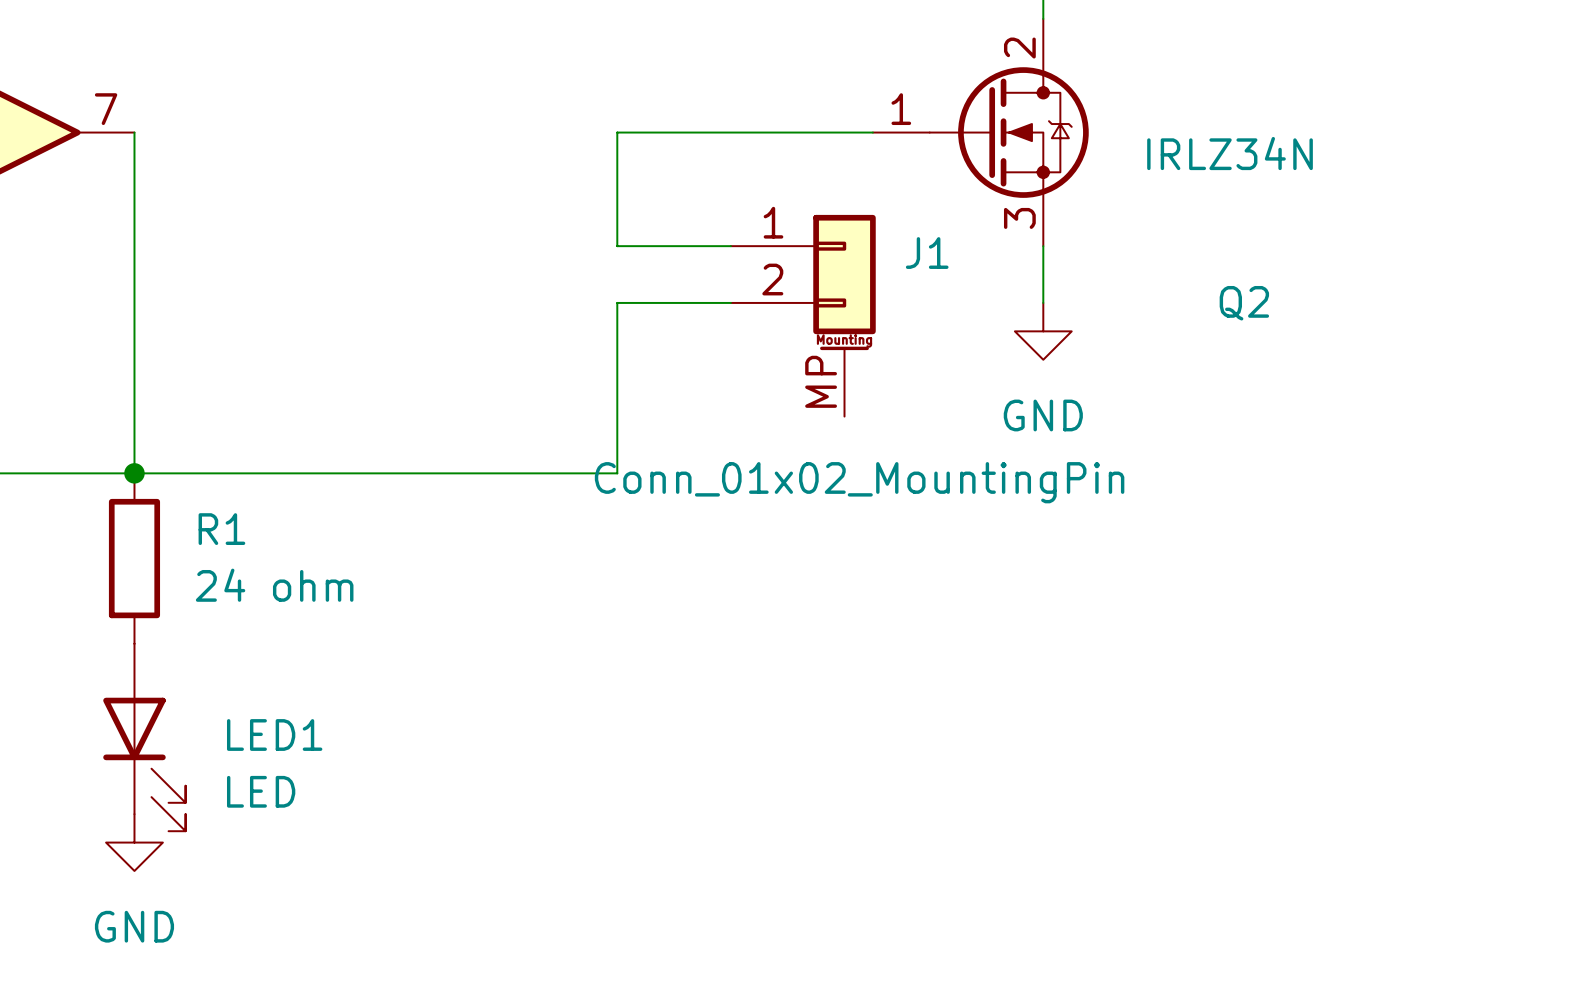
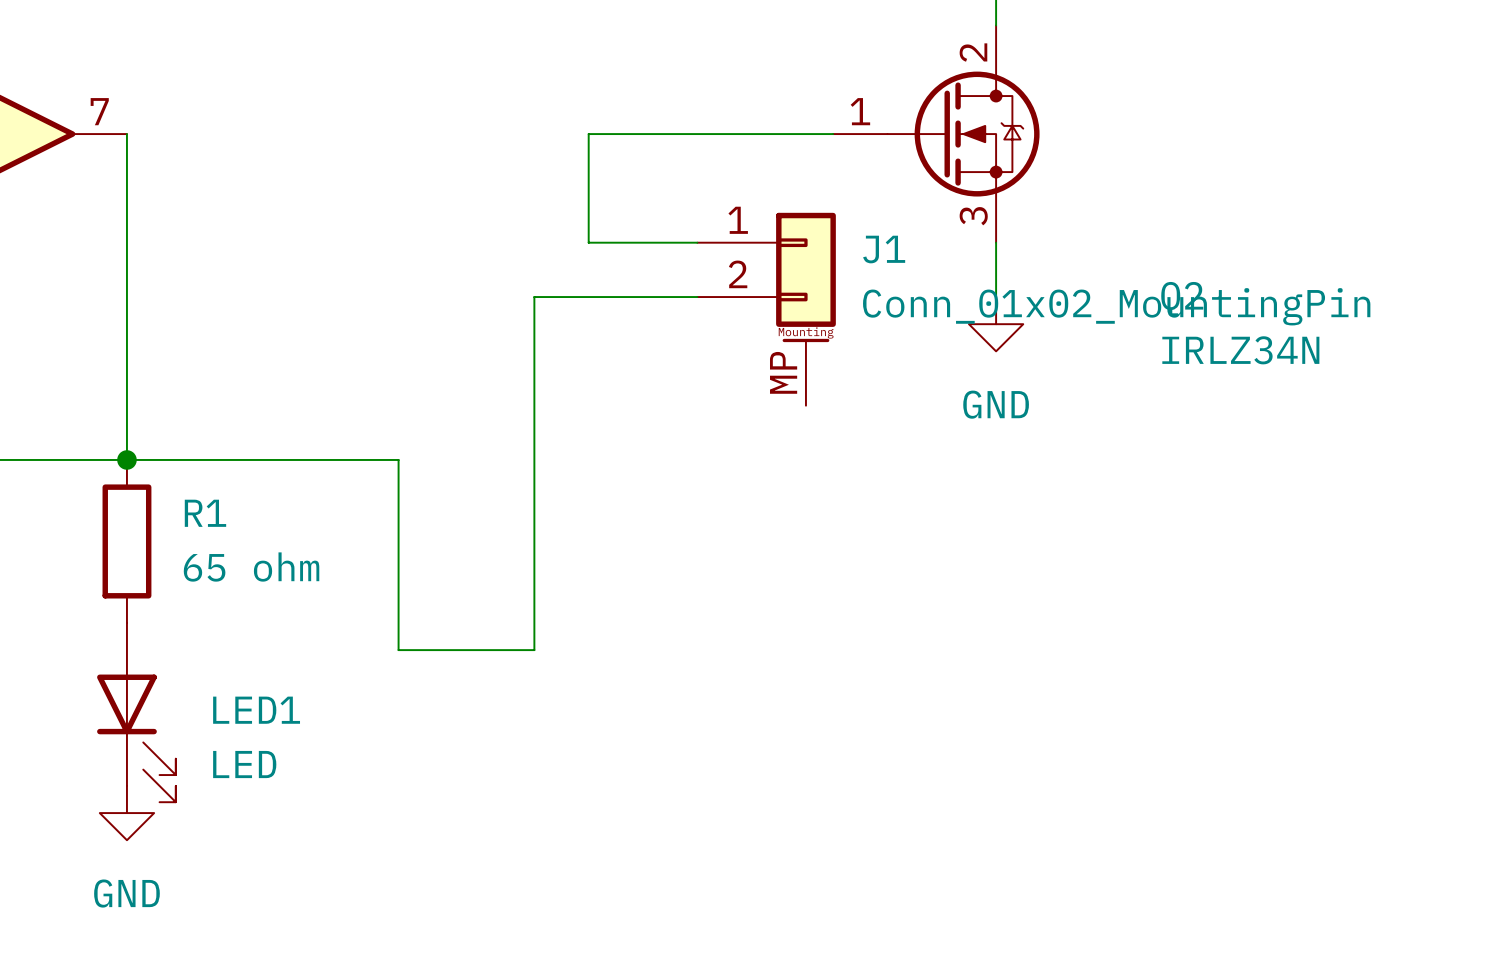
Q2 value position: IRLZ34N (1230, 153) -> IRLZ34N (1240, 350)
wire: (617, 302) (617, 473) (418, 473) -> (588, 297) (534, 297) (534, 650) (398, 650) (398, 459)
J1 value position: Conn_01x02_MountingPin (859, 482) -> Conn_01x02_MountingPin (1116, 306)
R1 value: 24 ohm (274, 585) -> 65 ohm (251, 567)

